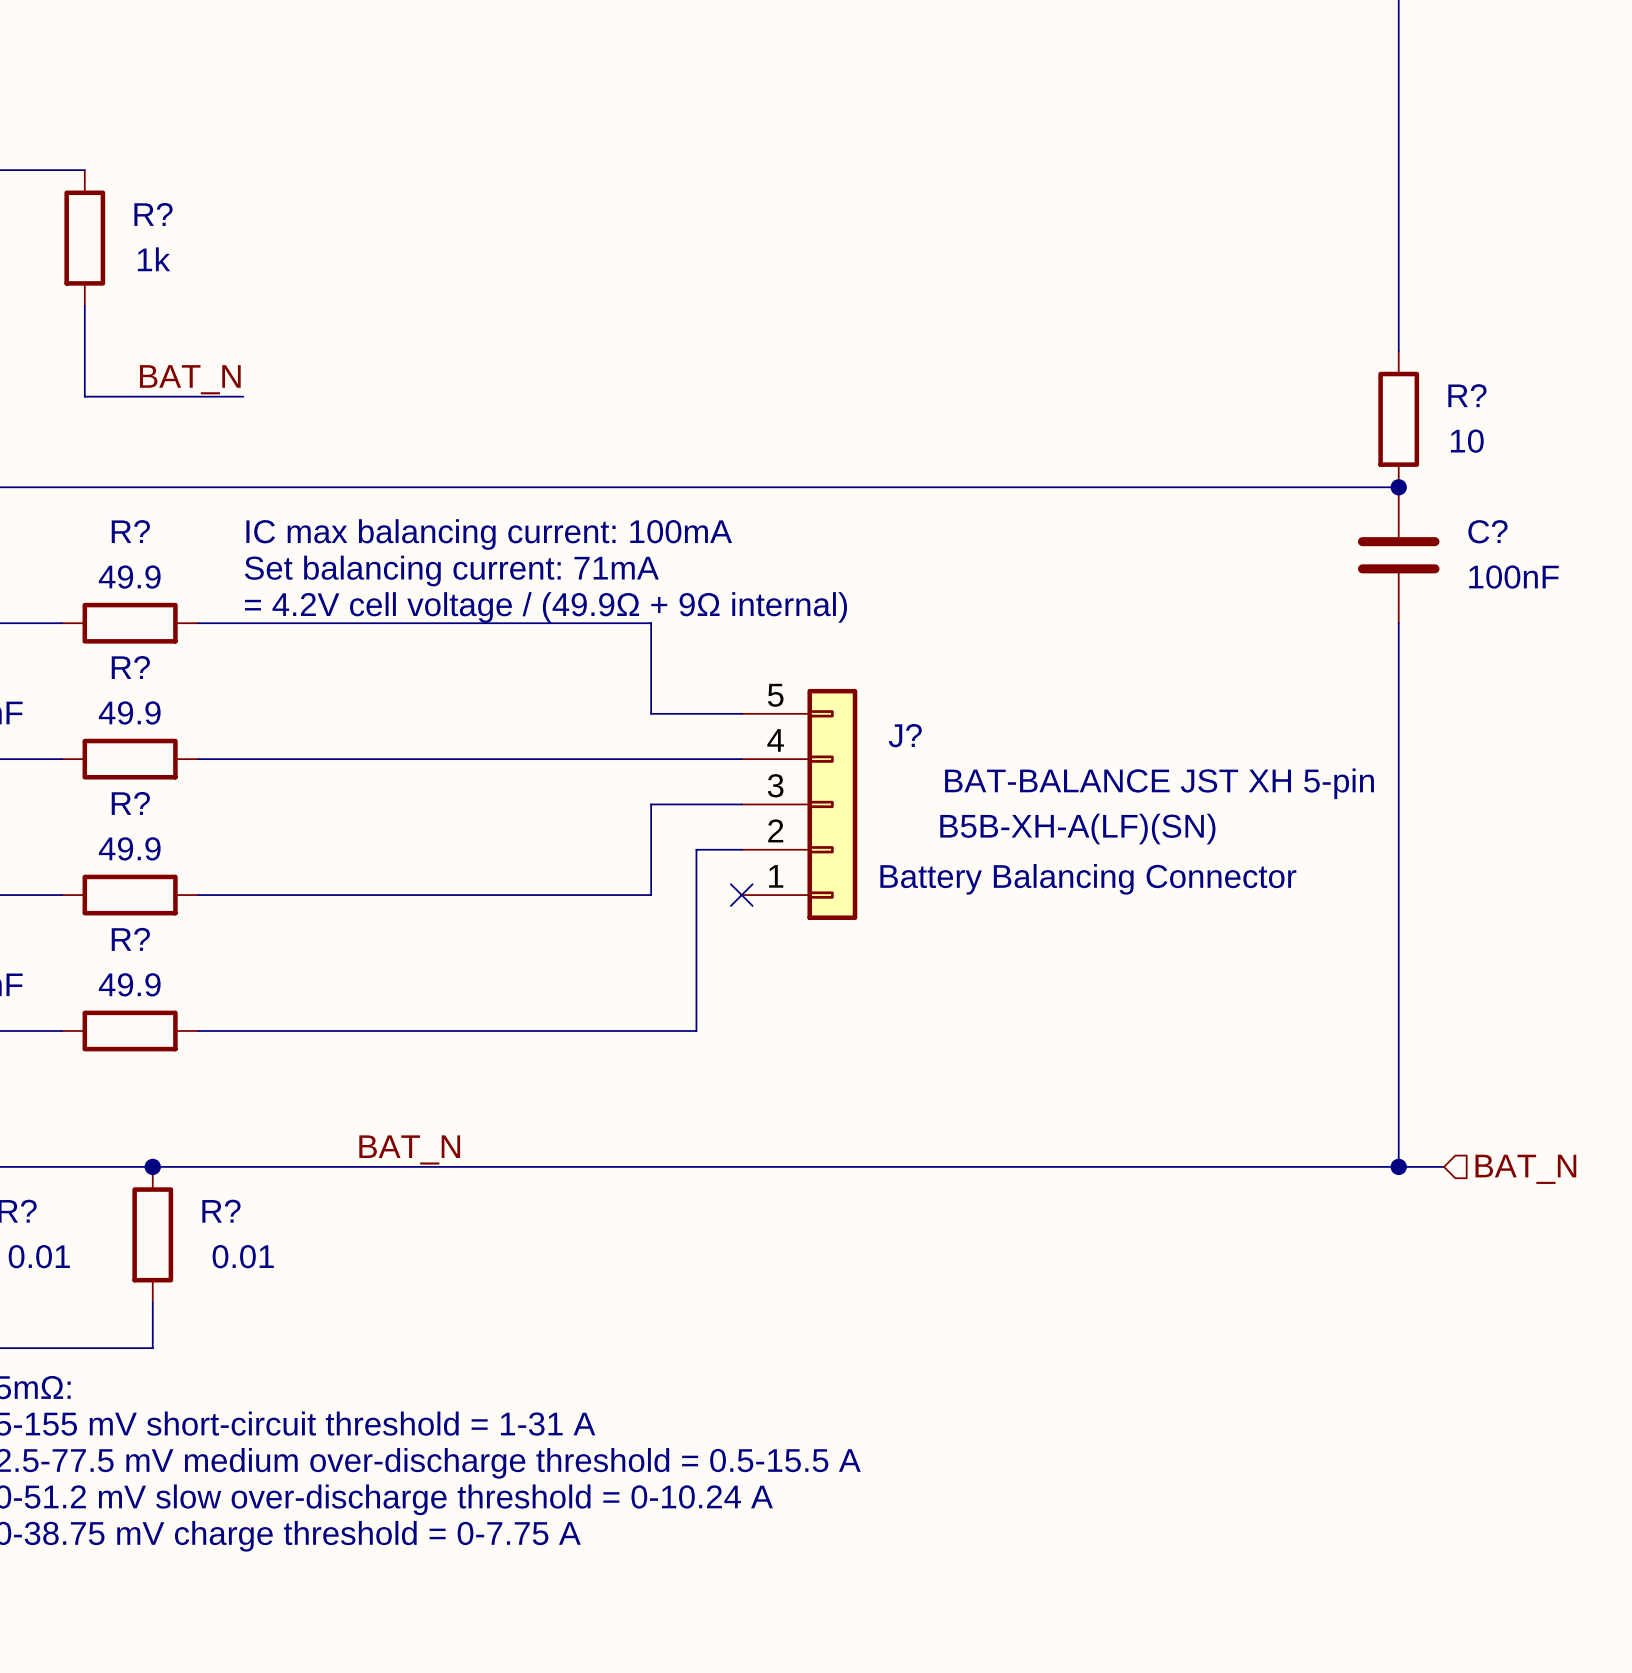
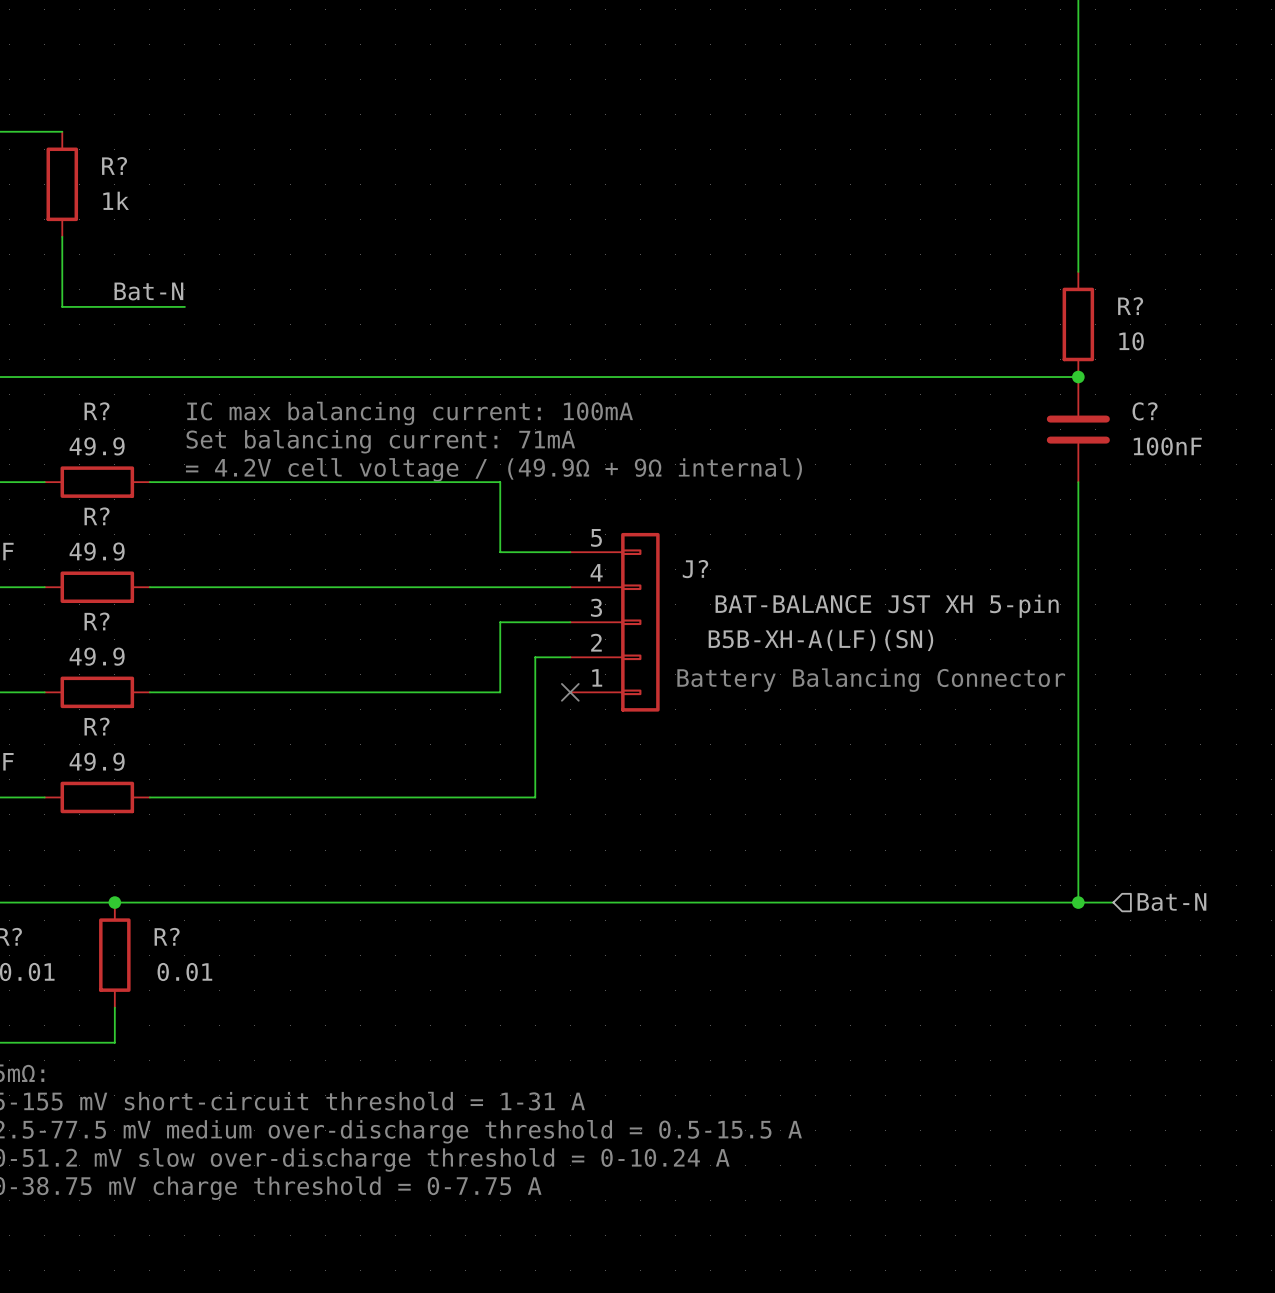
label: BAT_N (190, 379) -> Bat-N (148, 291)
label: BAT_N (409, 1149) -> none
hierarchical label: BAT_N (1525, 1169) -> Bat-N (1171, 902)

